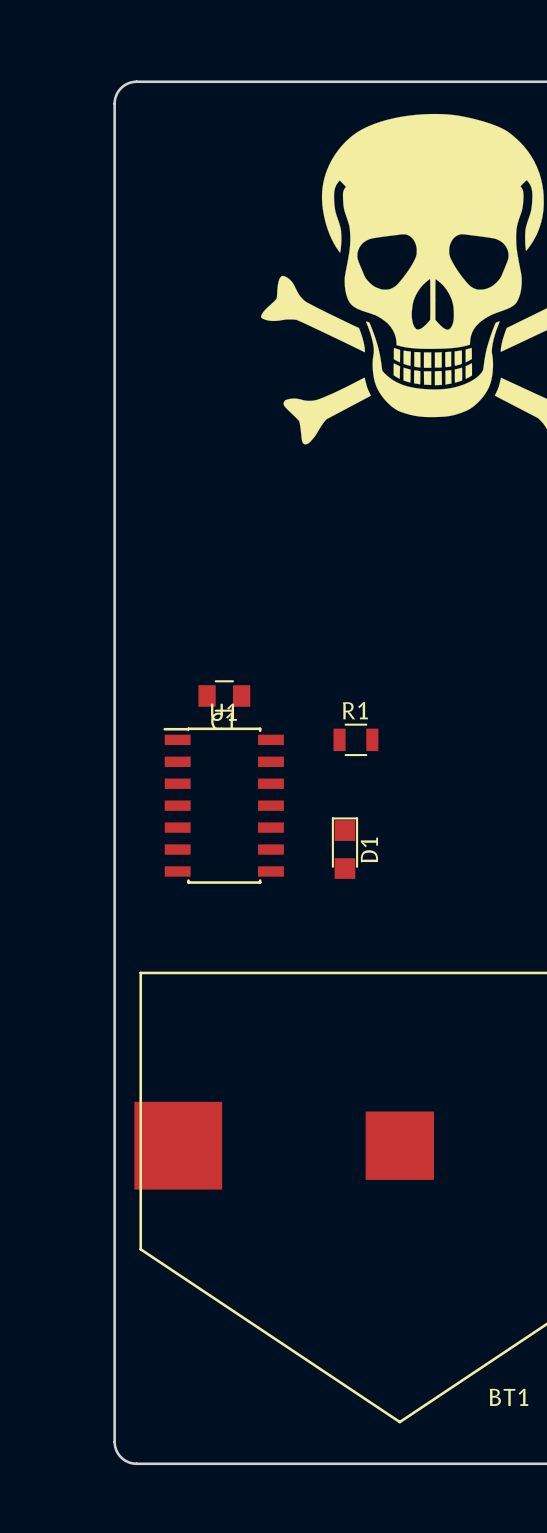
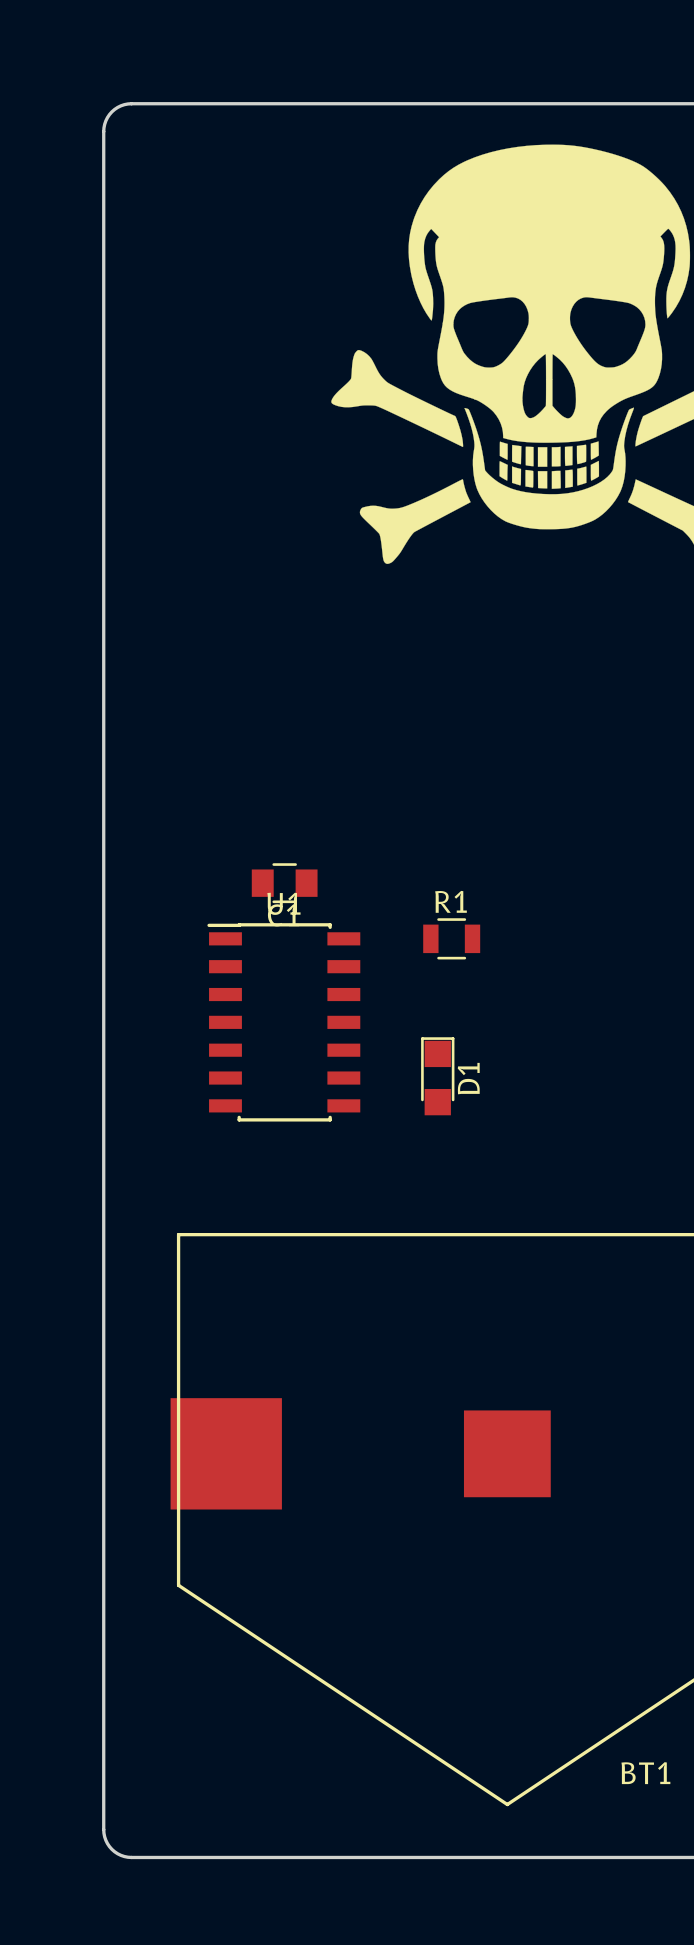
board edge: (136, 81) (128, 83) (121, 88) (116, 95) (114, 103) (114, 1441) (116, 1450) (121, 1457) (128, 1462) (136, 1463) -> (173, 103) (131, 103) (120, 105) (107, 117) (103, 131) (103, 1829) (107, 1843) (120, 1855) (131, 1857) (173, 1857)

